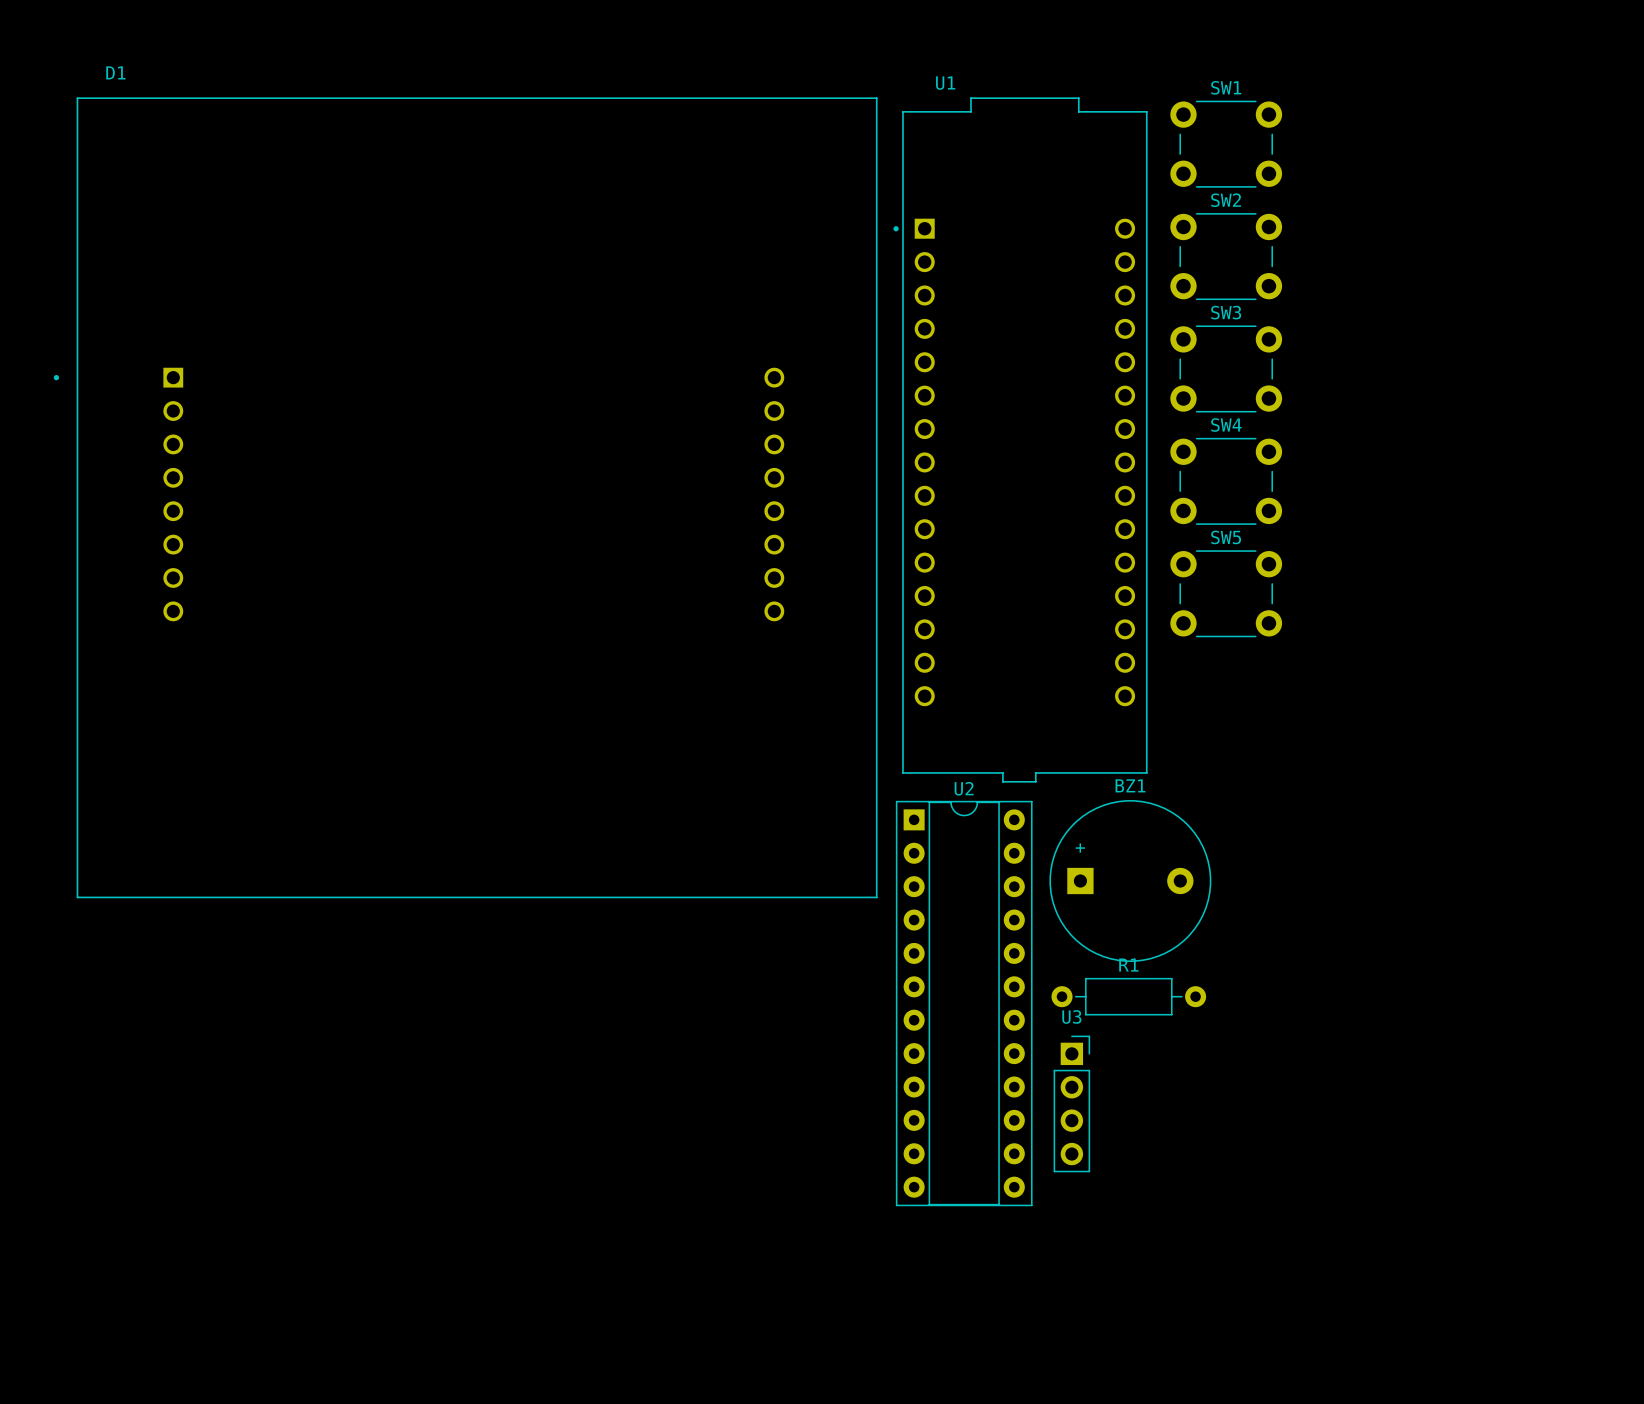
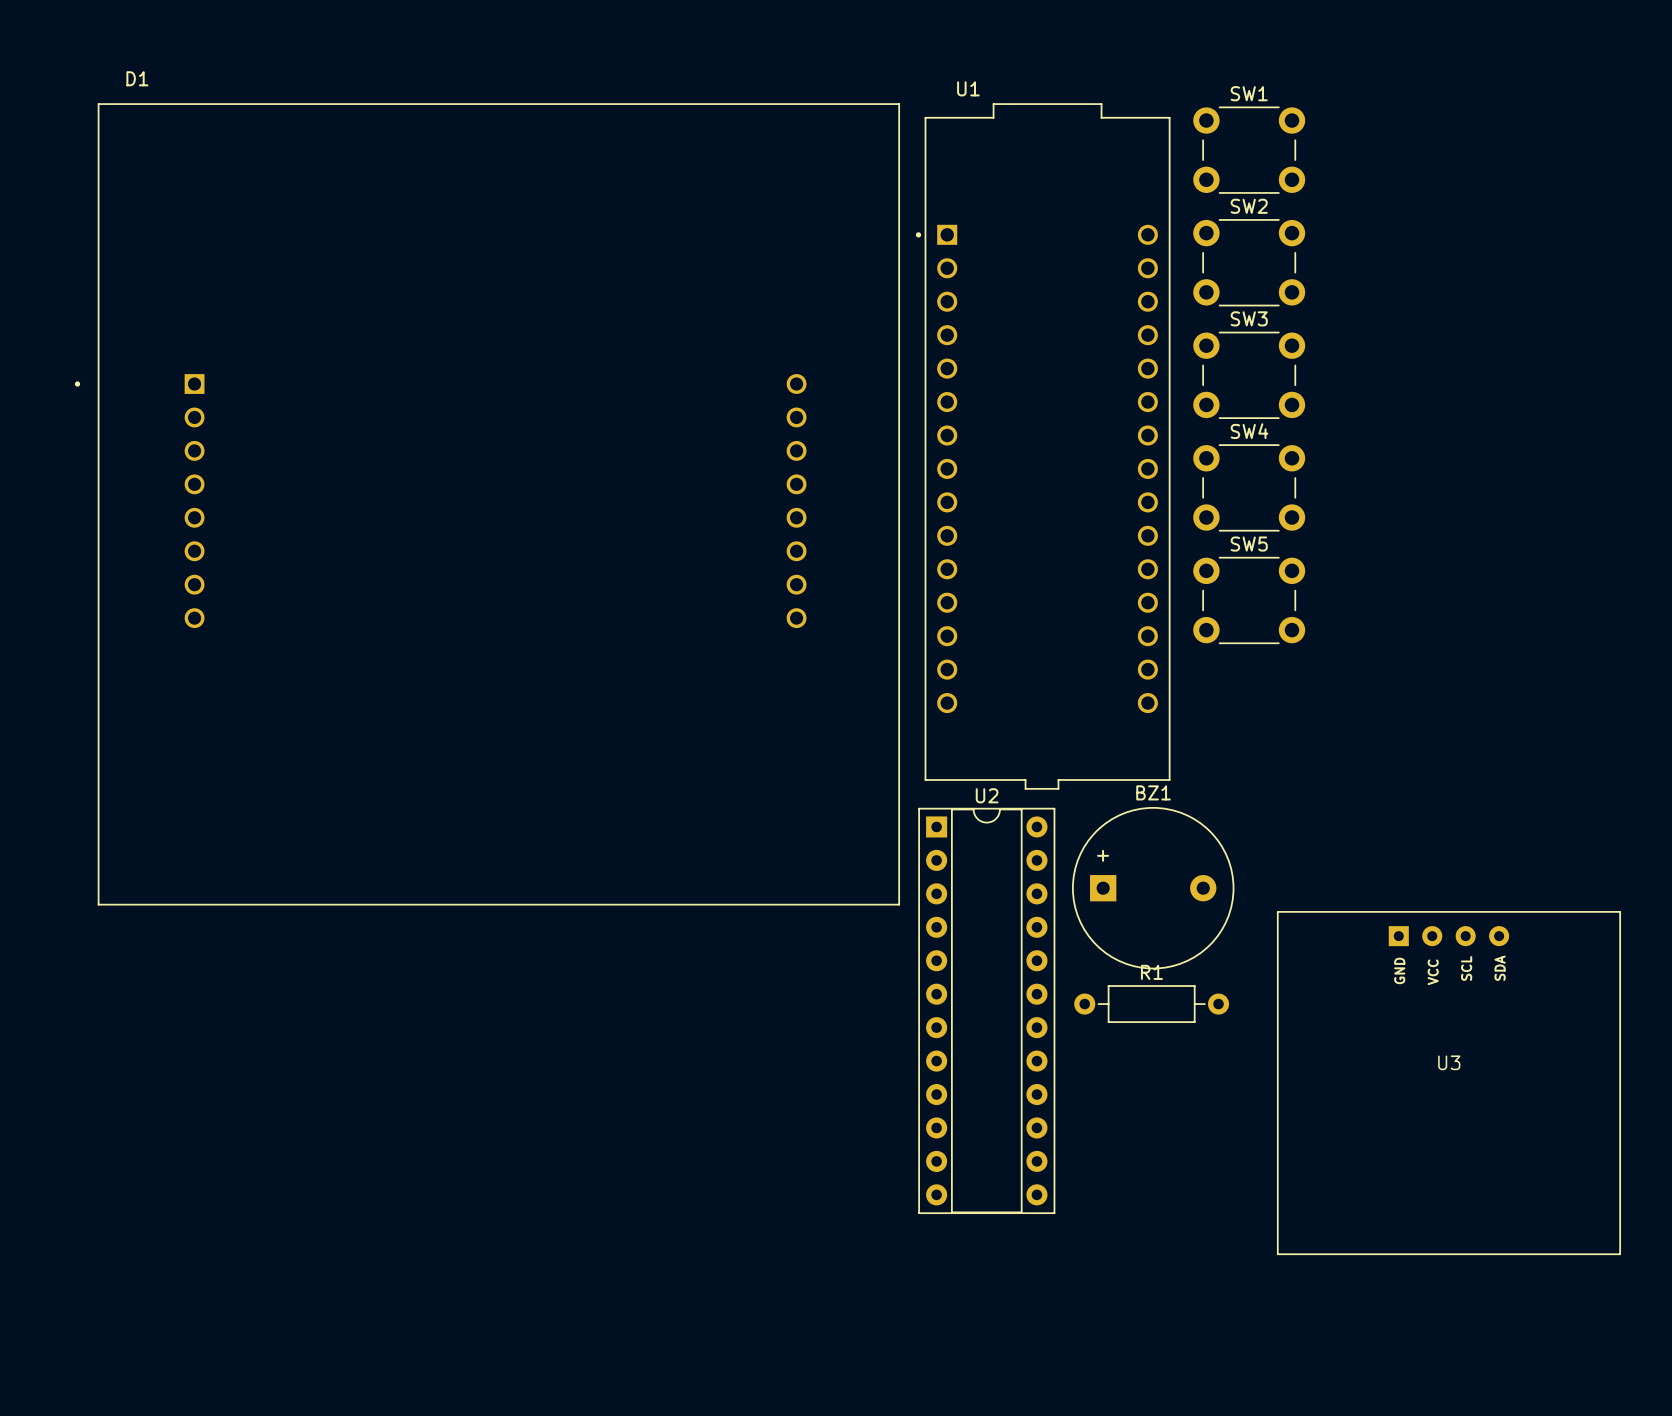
U3 name position: U3 (1071, 1016) -> U3 (1449, 1062)
U3 footprint: [1053, 1035, 1091, 1173] -> [1277, 911, 1621, 1255]

